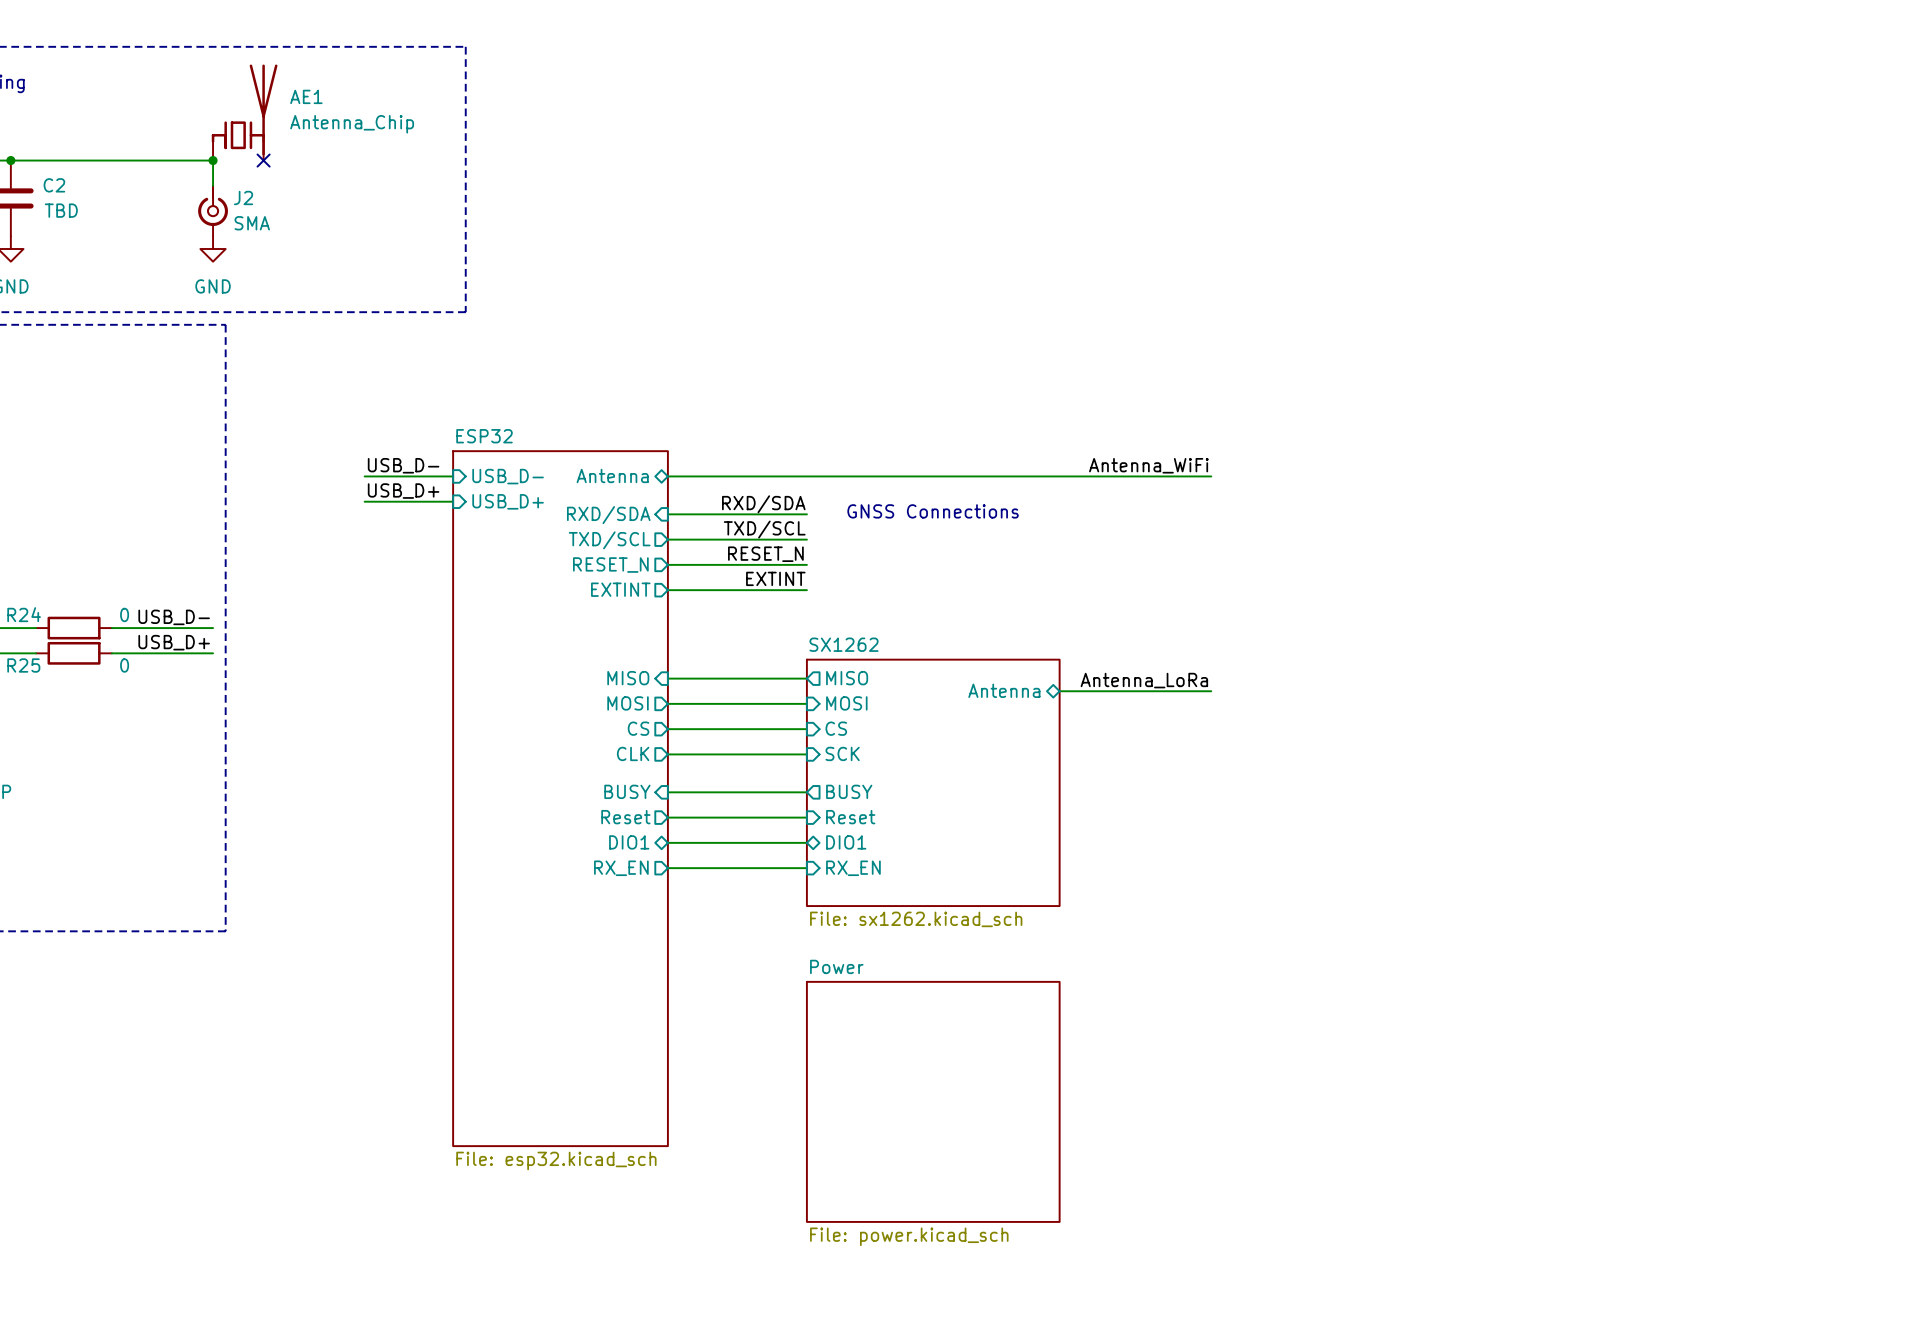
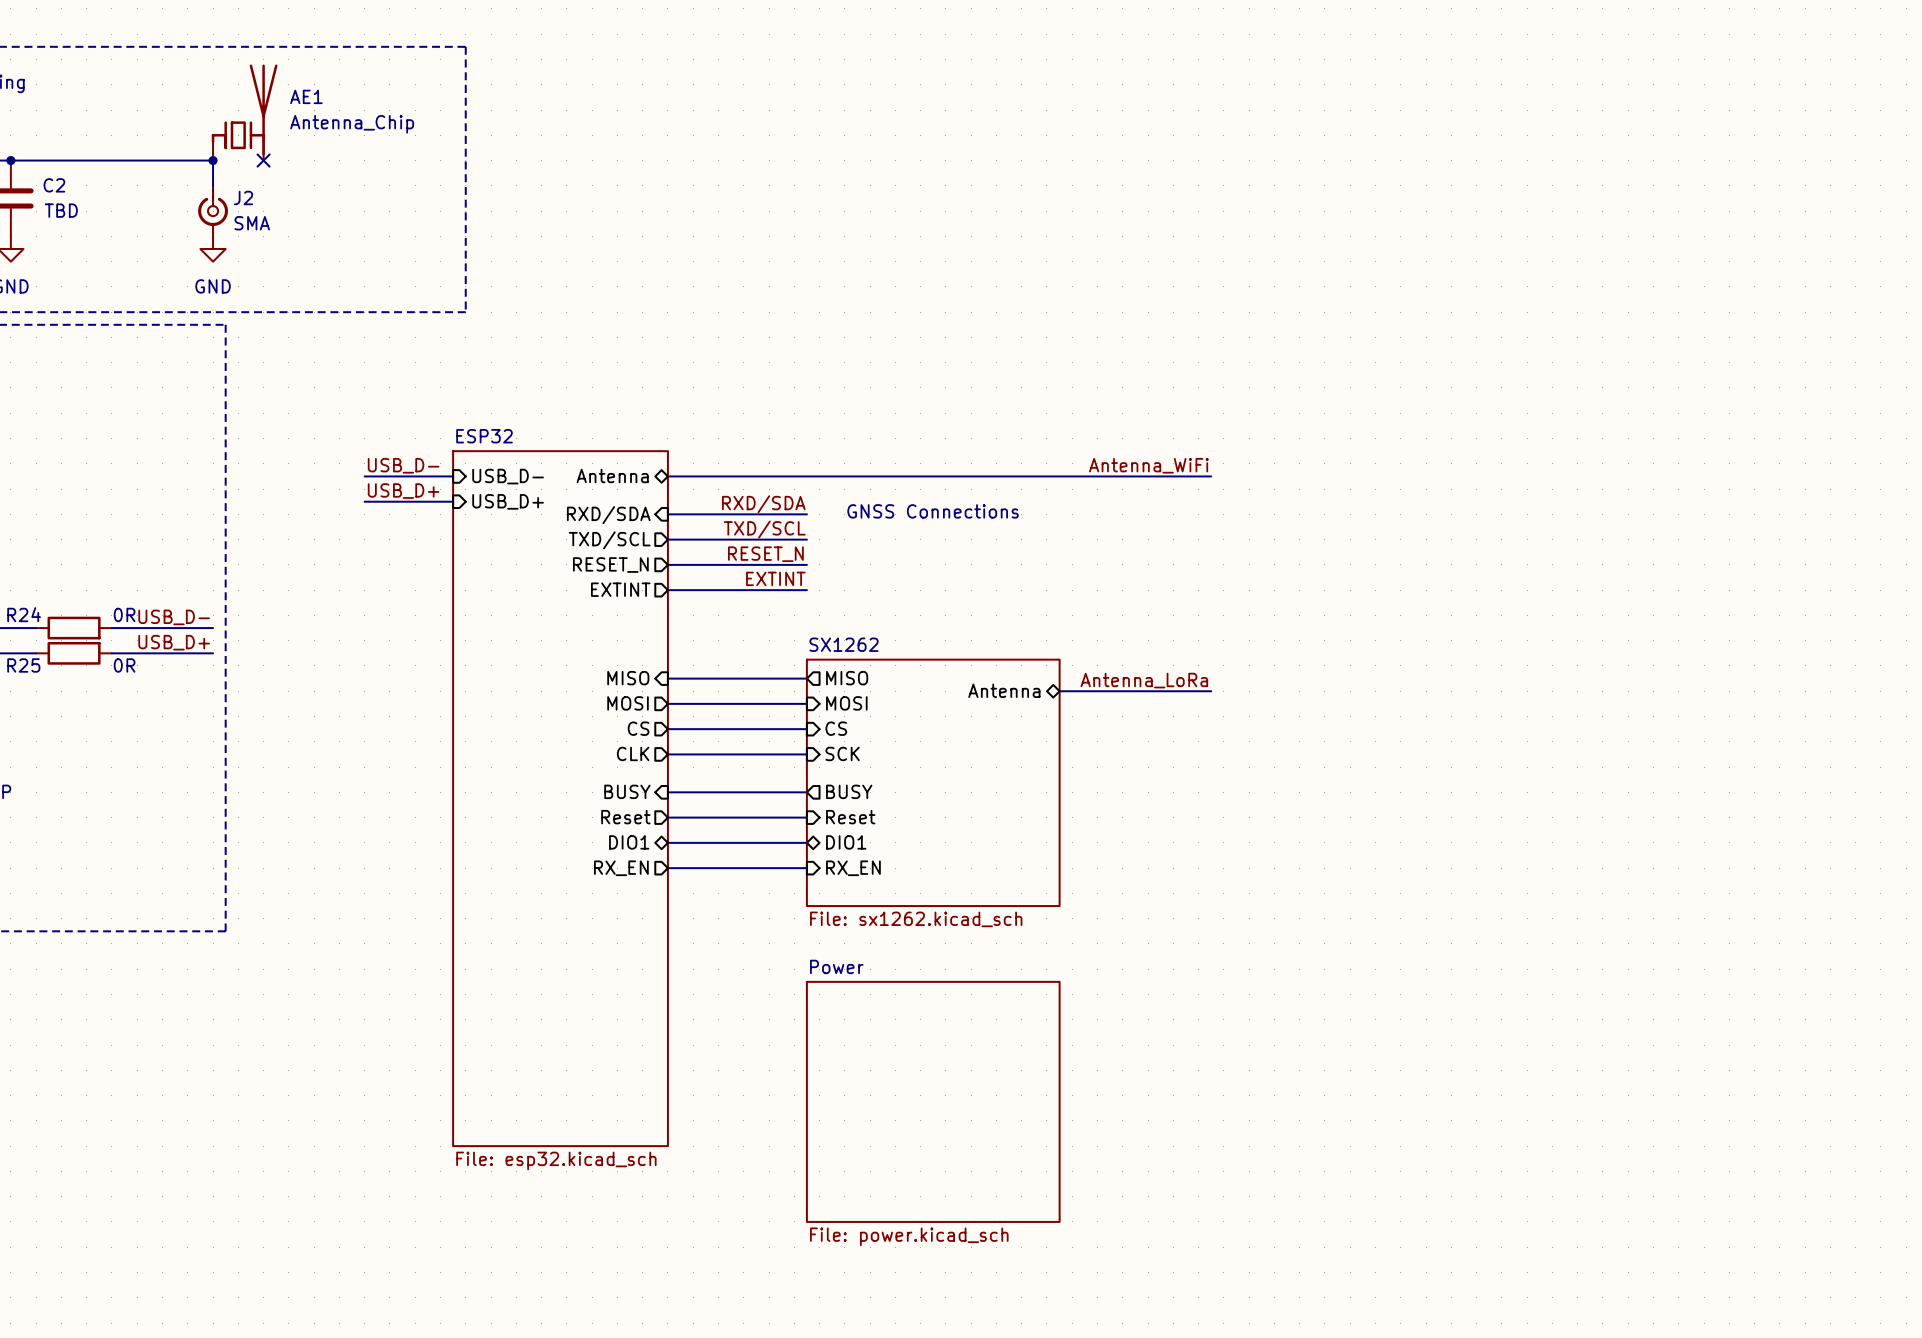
R24 value: 0 (124, 614) -> 0R (124, 614)
R25 value: 0 (124, 665) -> 0R (124, 665)

